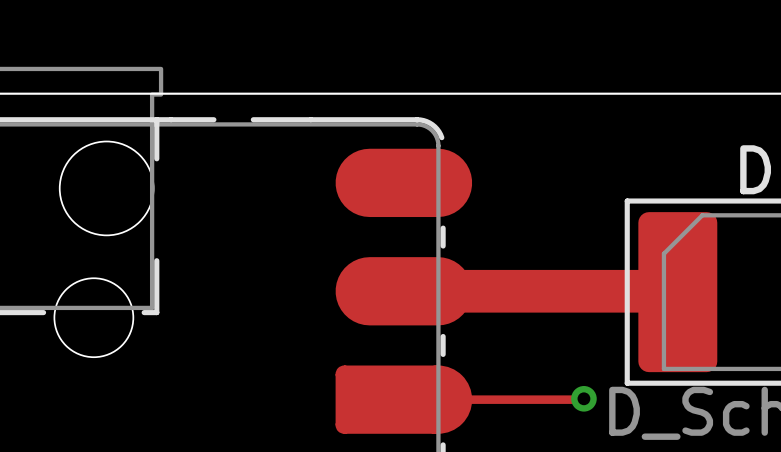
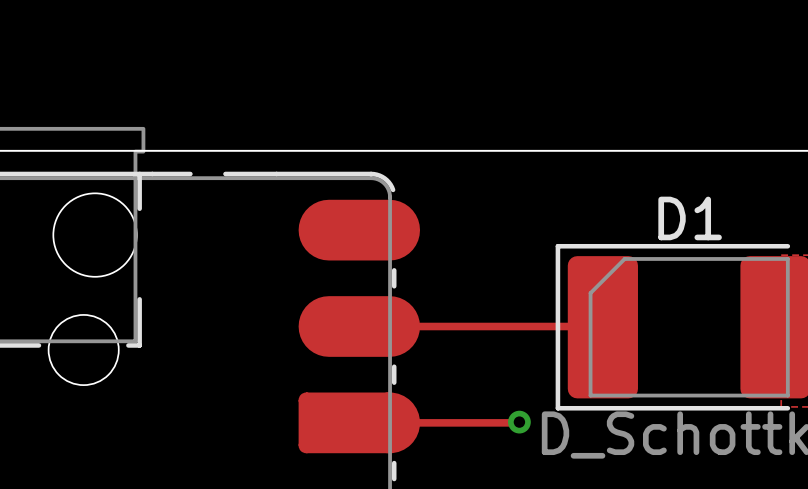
track width: thick (430, 291) (676, 291) -> thin (382, 326) (602, 326)

